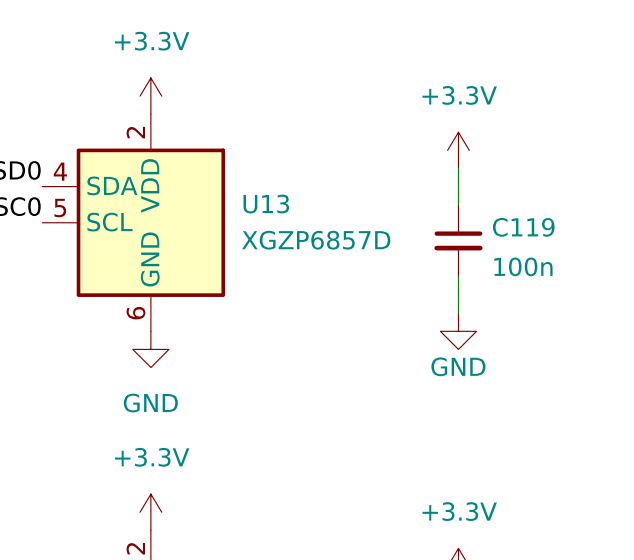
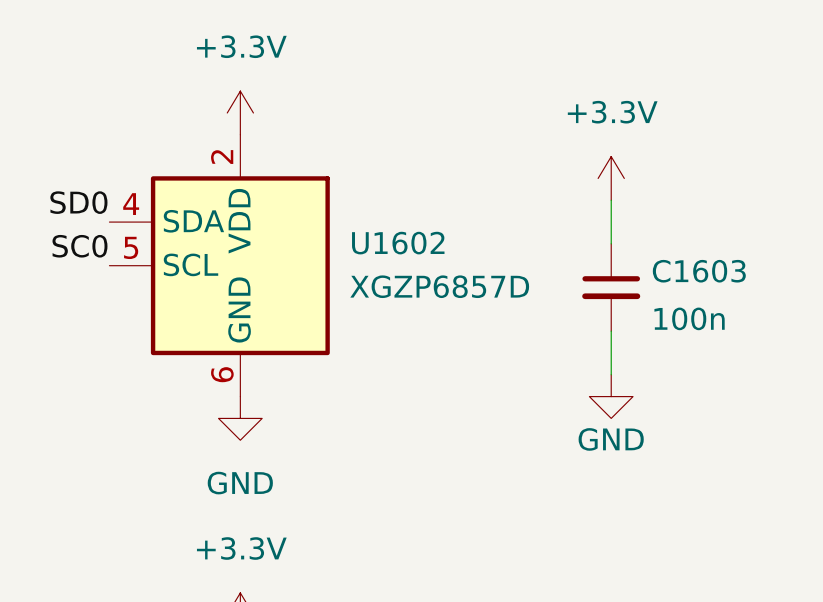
U13 name: U13 (266, 204) -> U1602 (398, 243)
C119 name: C119 (523, 227) -> C1603 (699, 271)

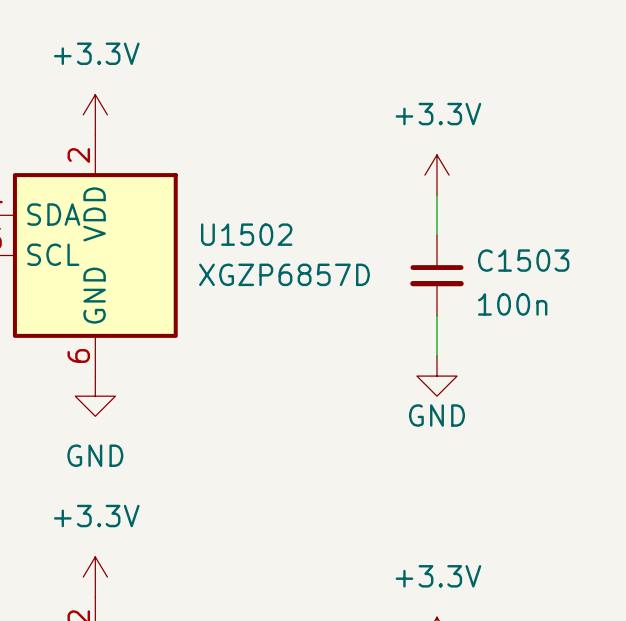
U1602 name: U1602 (398, 243) -> U1502 (246, 234)
C1603 name: C1603 (699, 271) -> C1503 (523, 260)

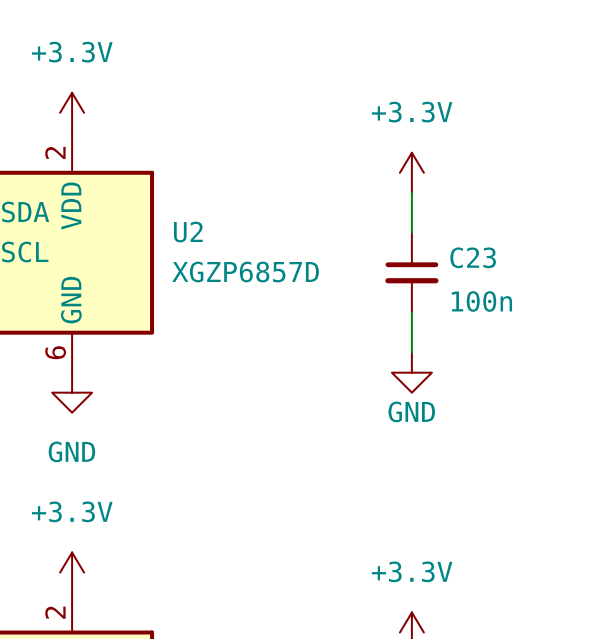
U1502 name: U1502 (246, 234) -> U2 (188, 232)
C1503 name: C1503 (523, 260) -> C23 (473, 257)

